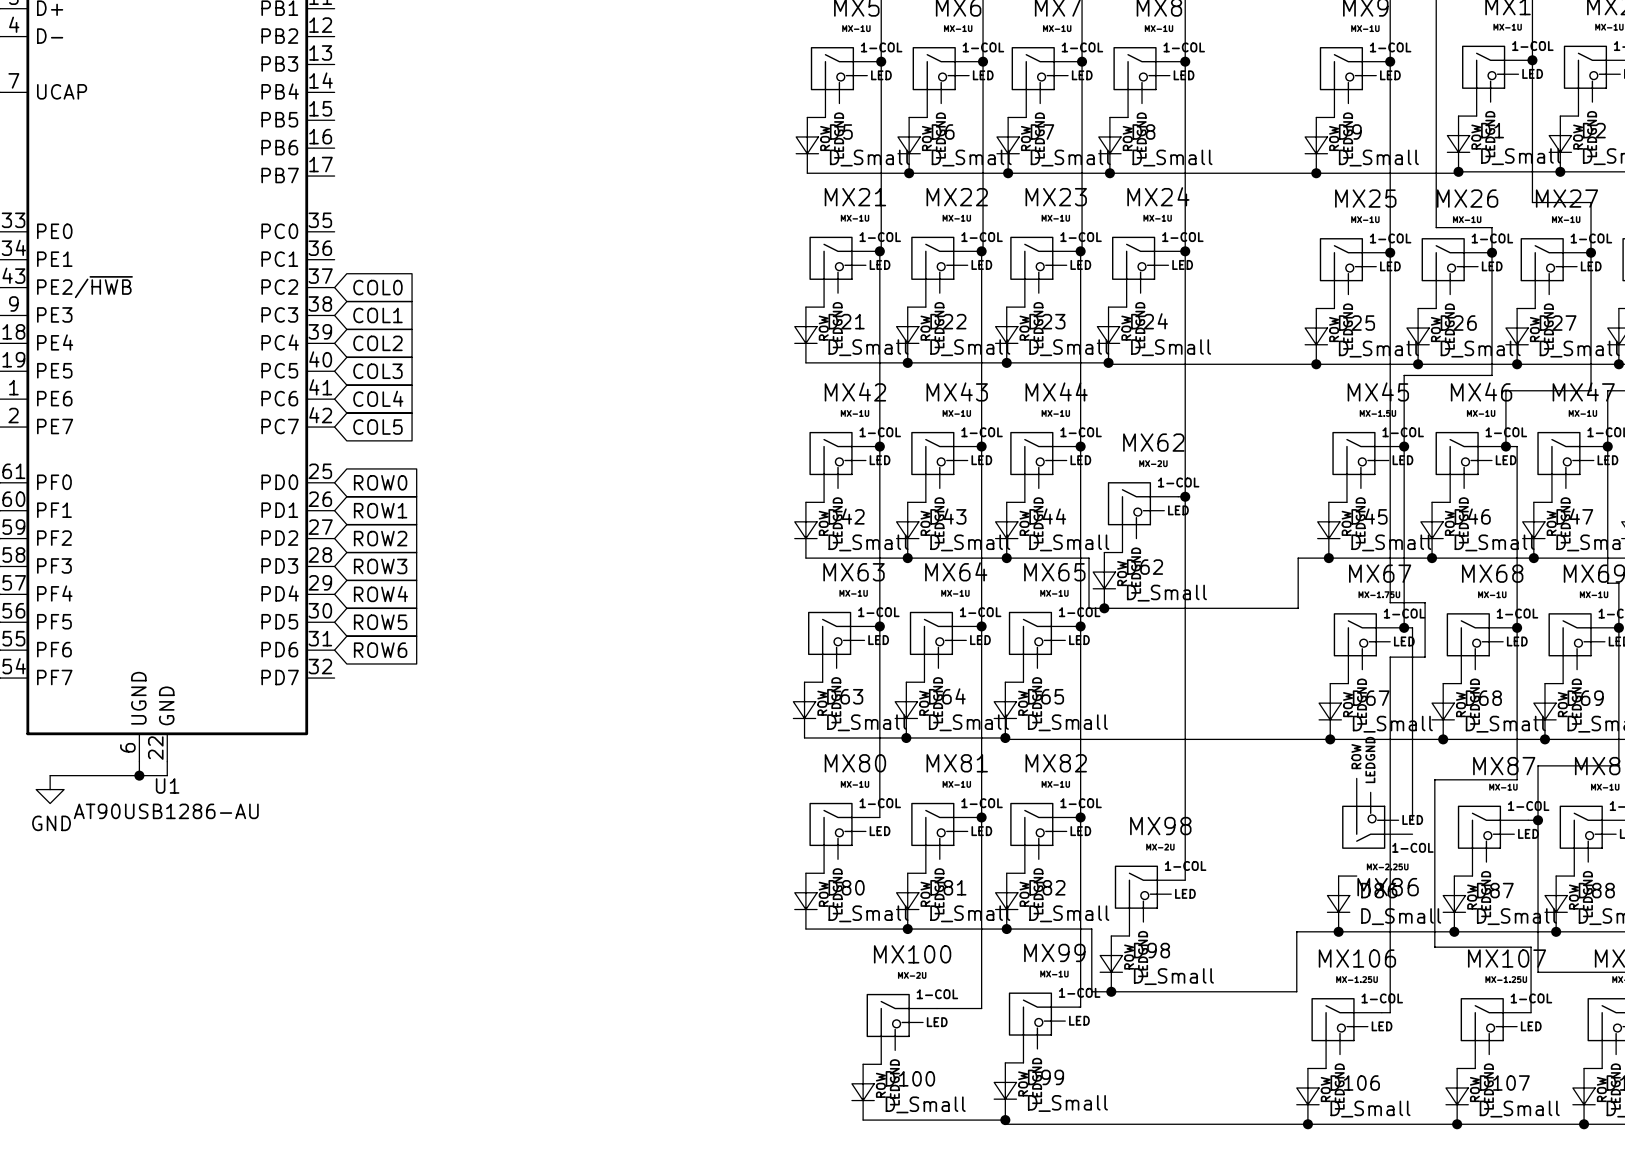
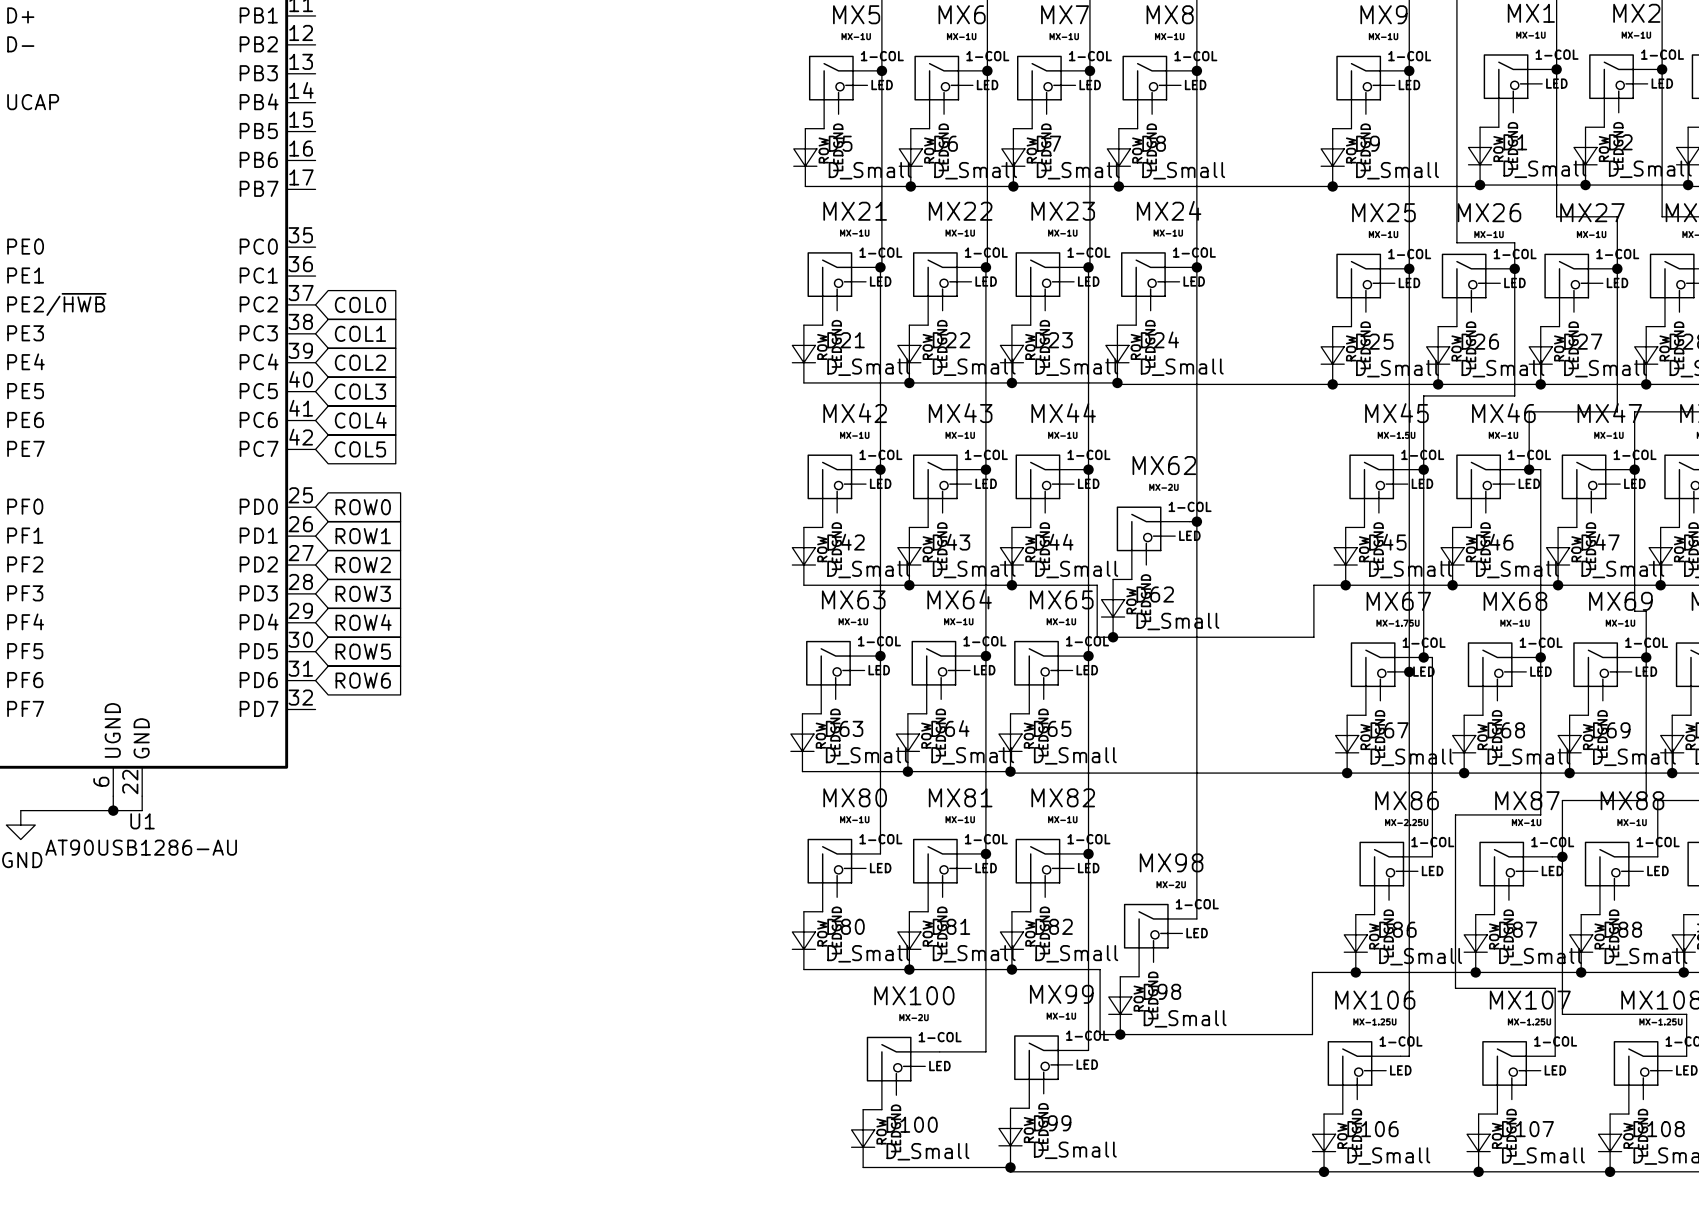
wire: (1390, 602) (1425, 602) (1425, 657) (1390, 657) -> (1409, 631) (1409, 687)
junction: none -> (1409, 671)
MX86 flip: as is (1363, 827) -> up-down (1381, 864)

